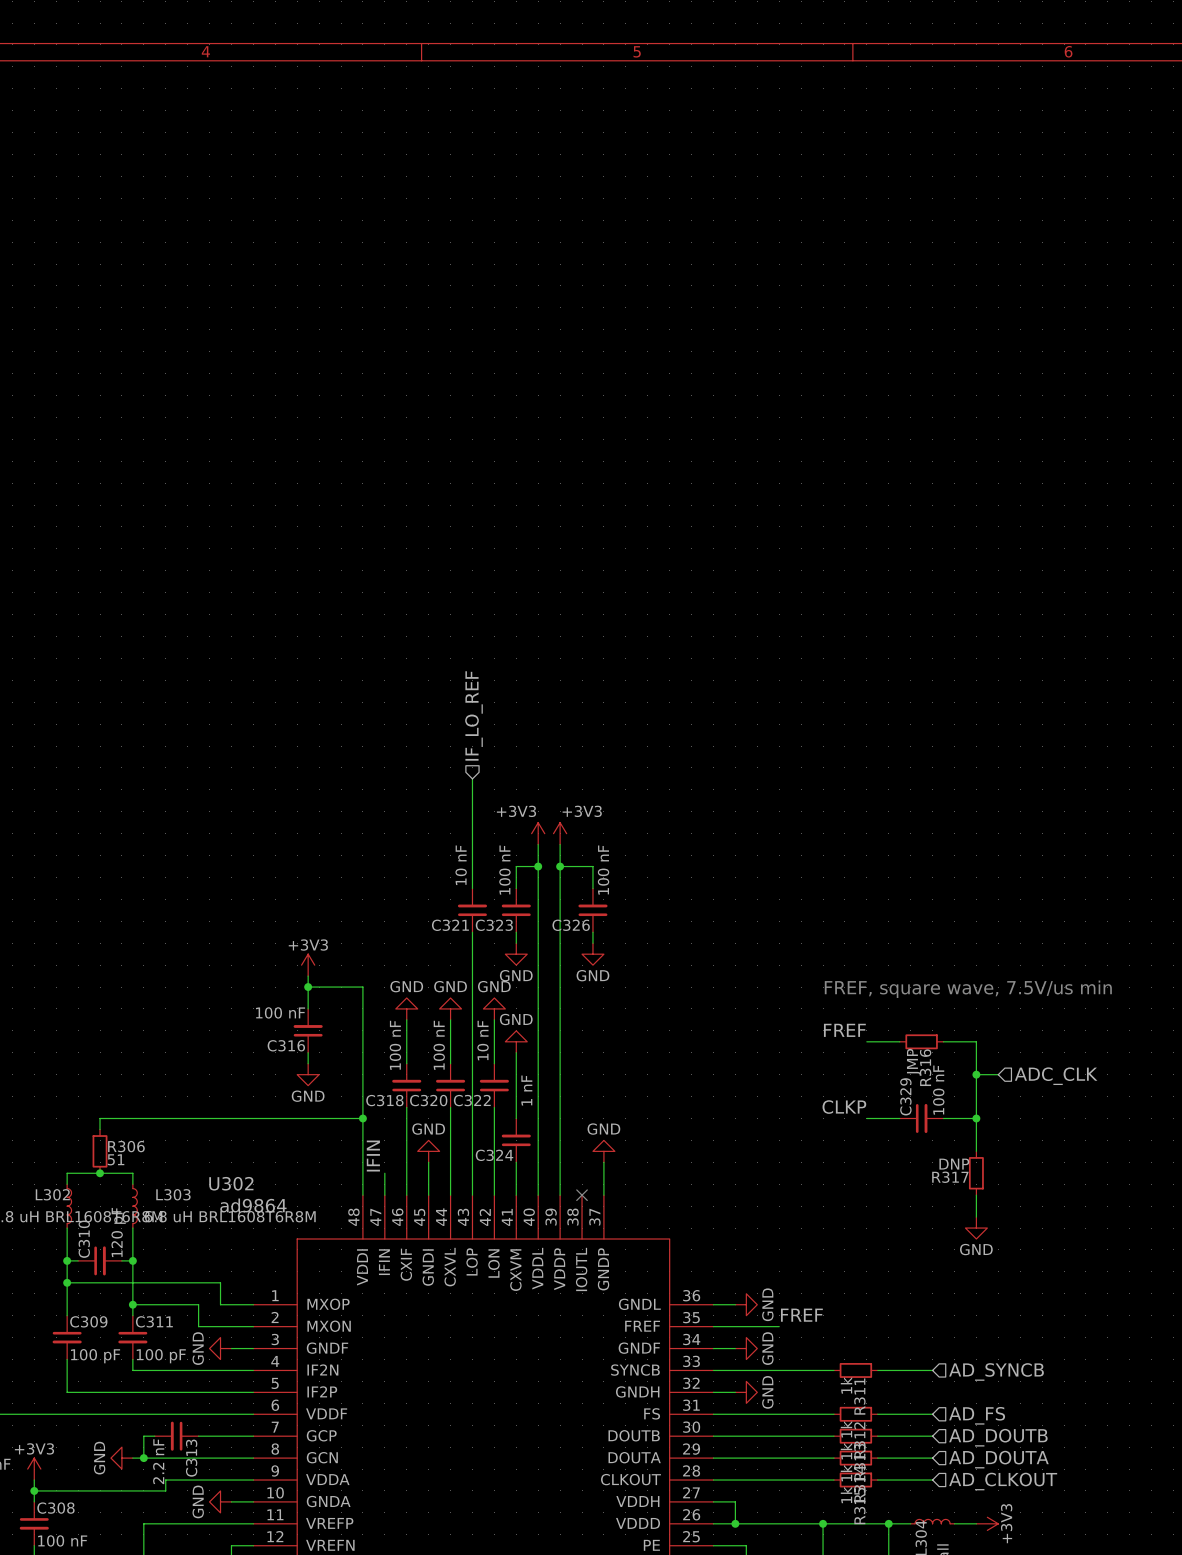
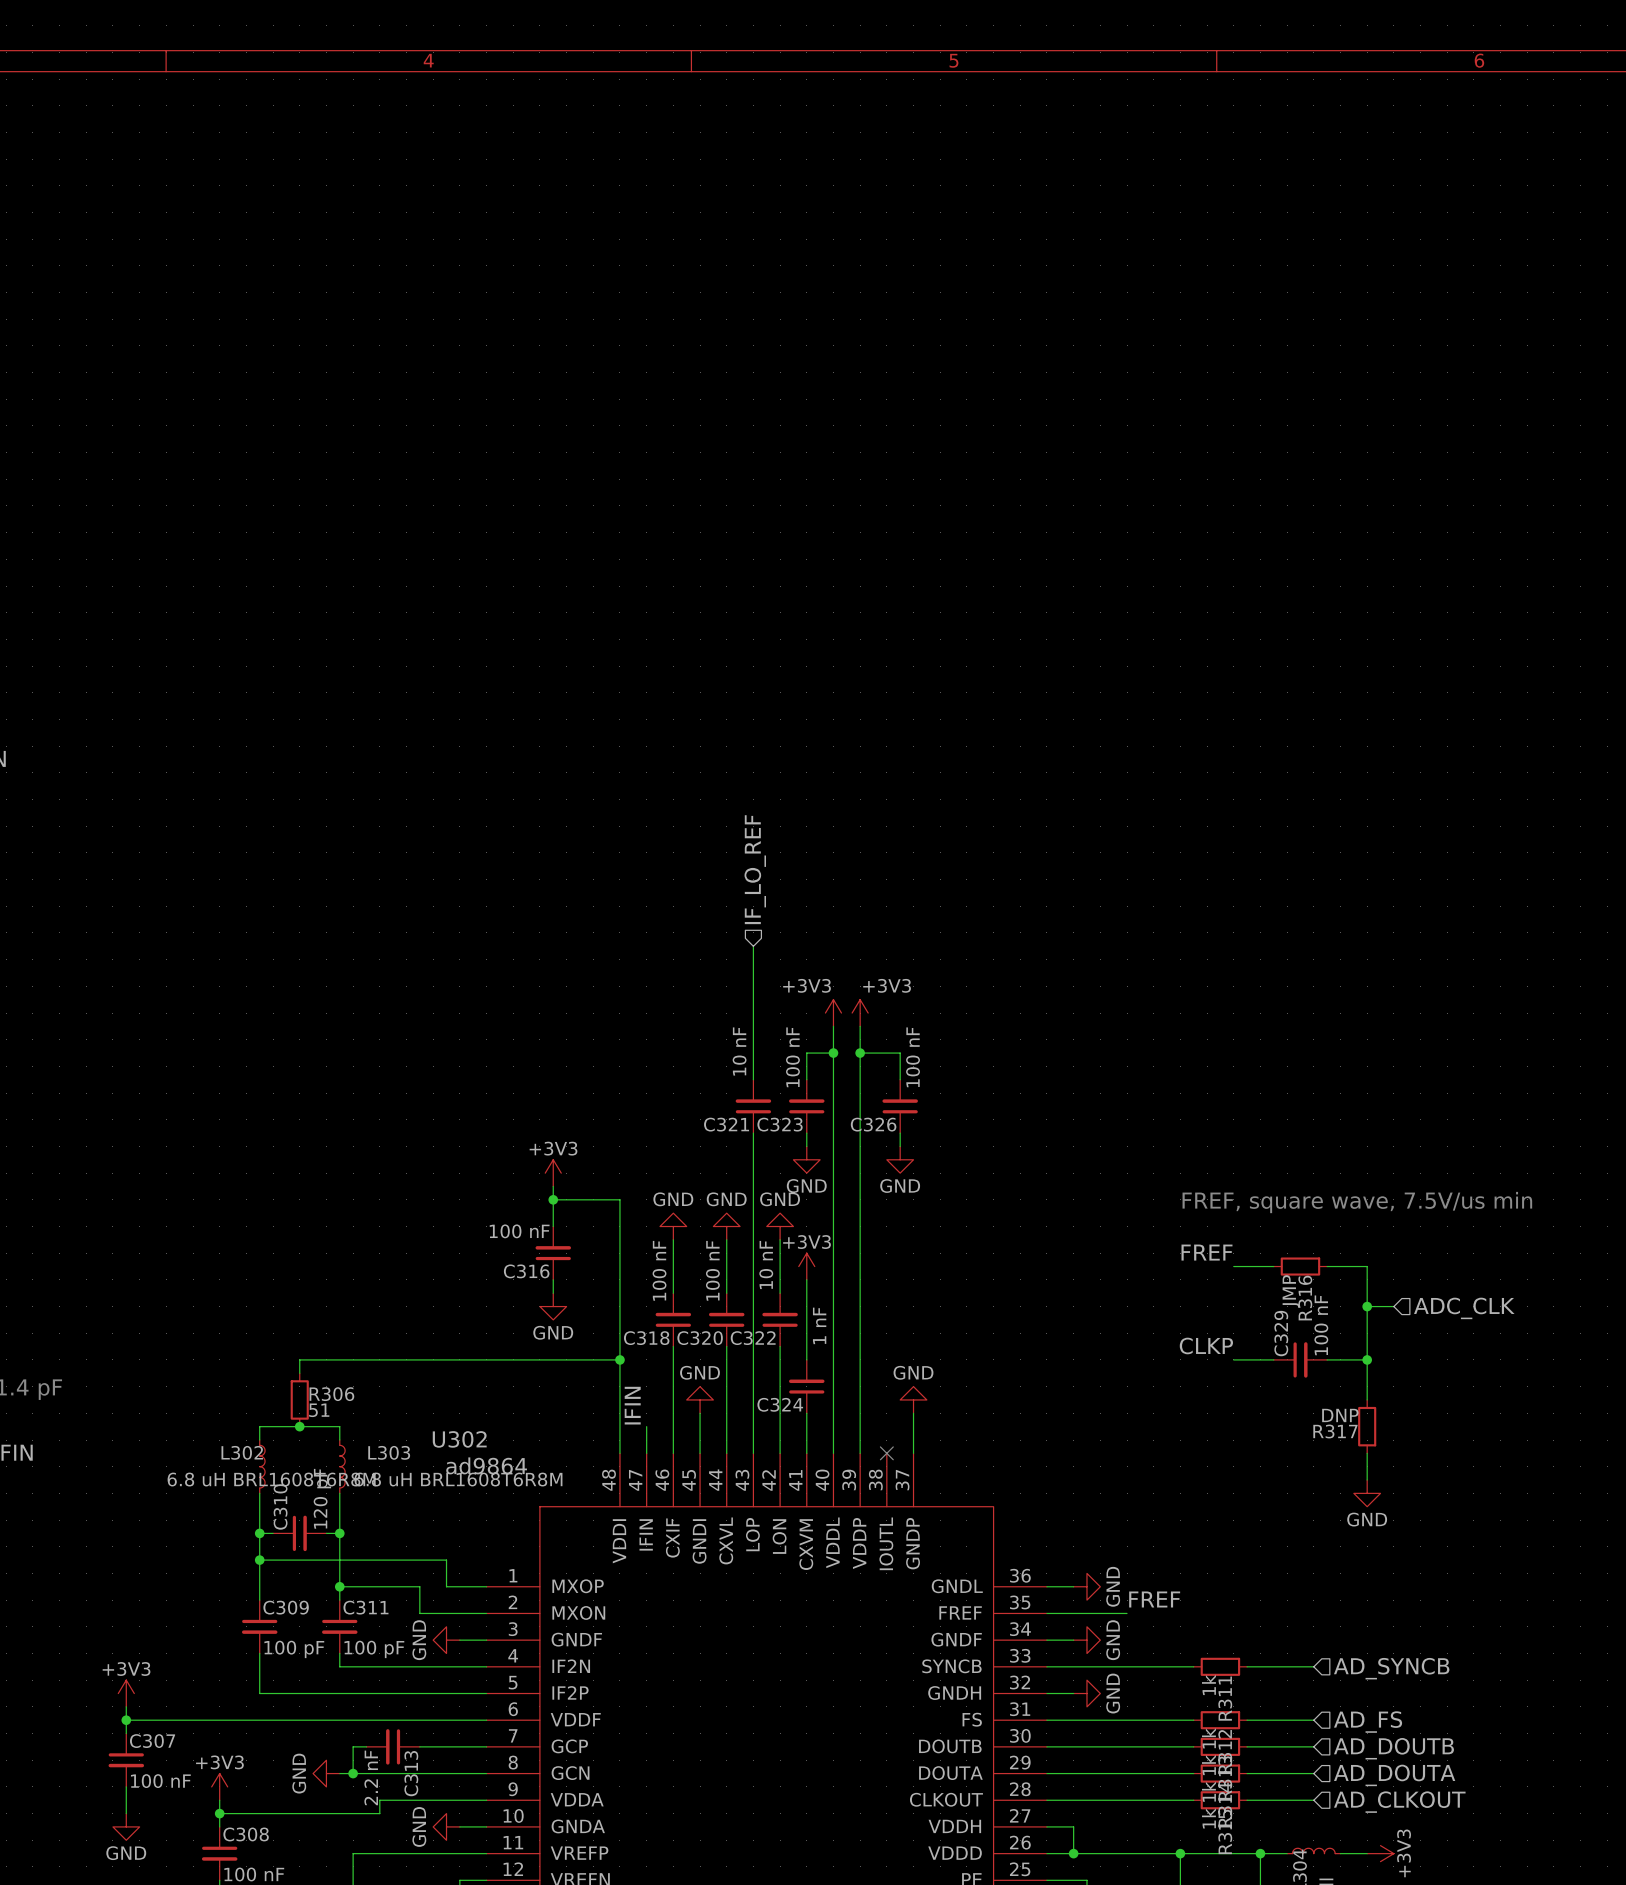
power symbol: GND (516, 1041) -> +3V3 (806, 1266)

